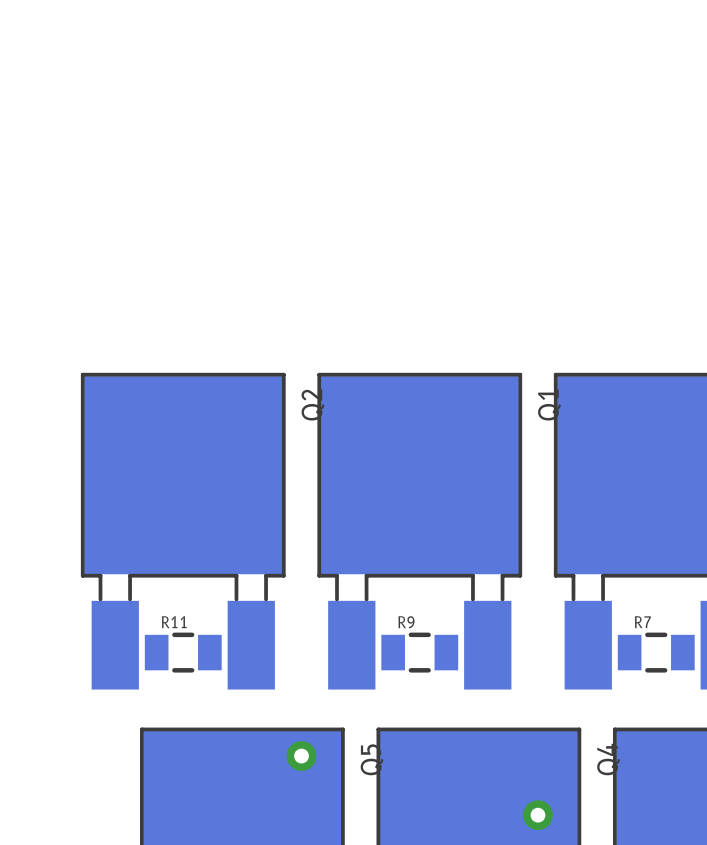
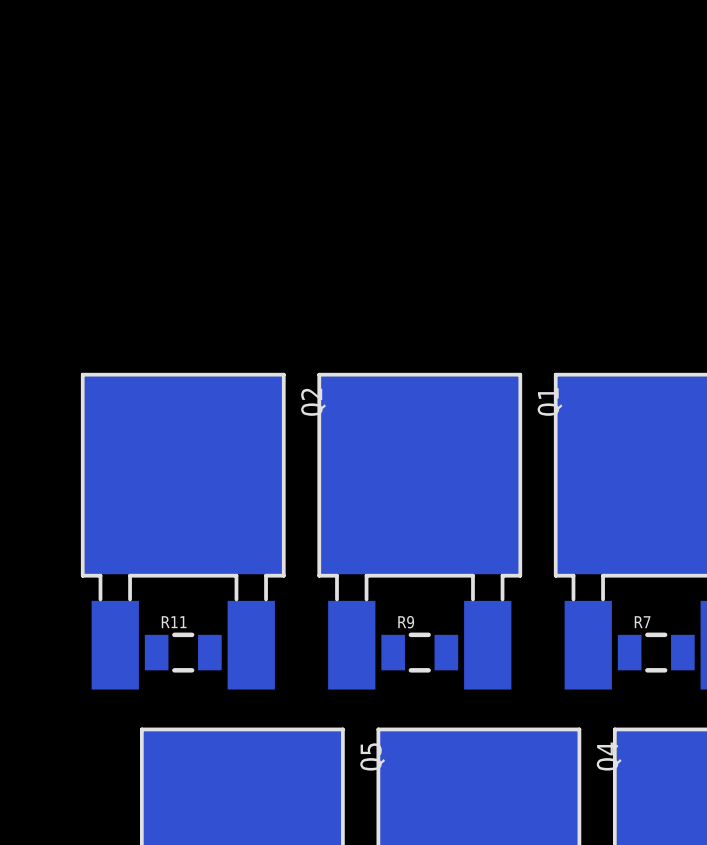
part: (301, 756) -> none
part: (538, 815) -> none

